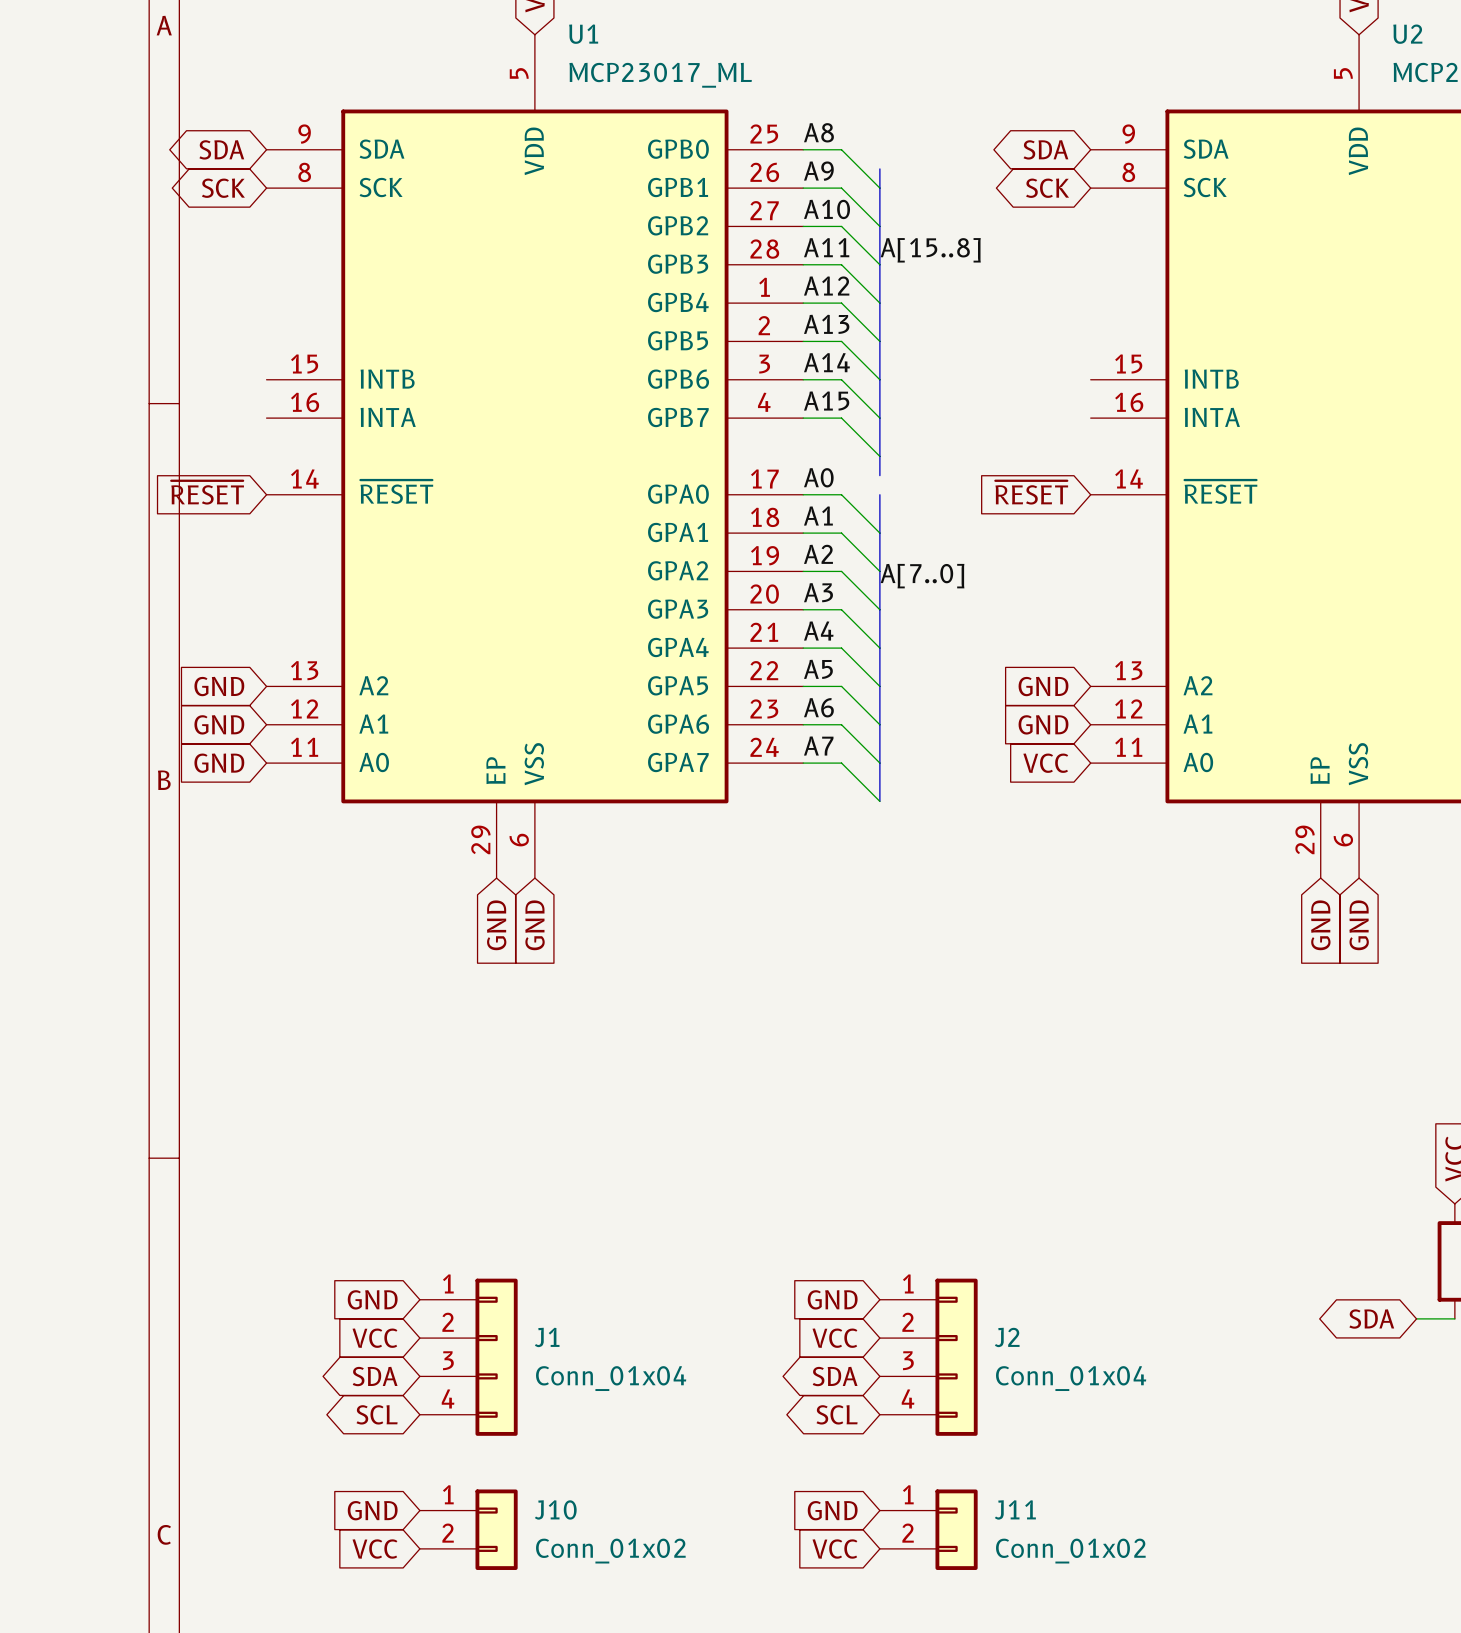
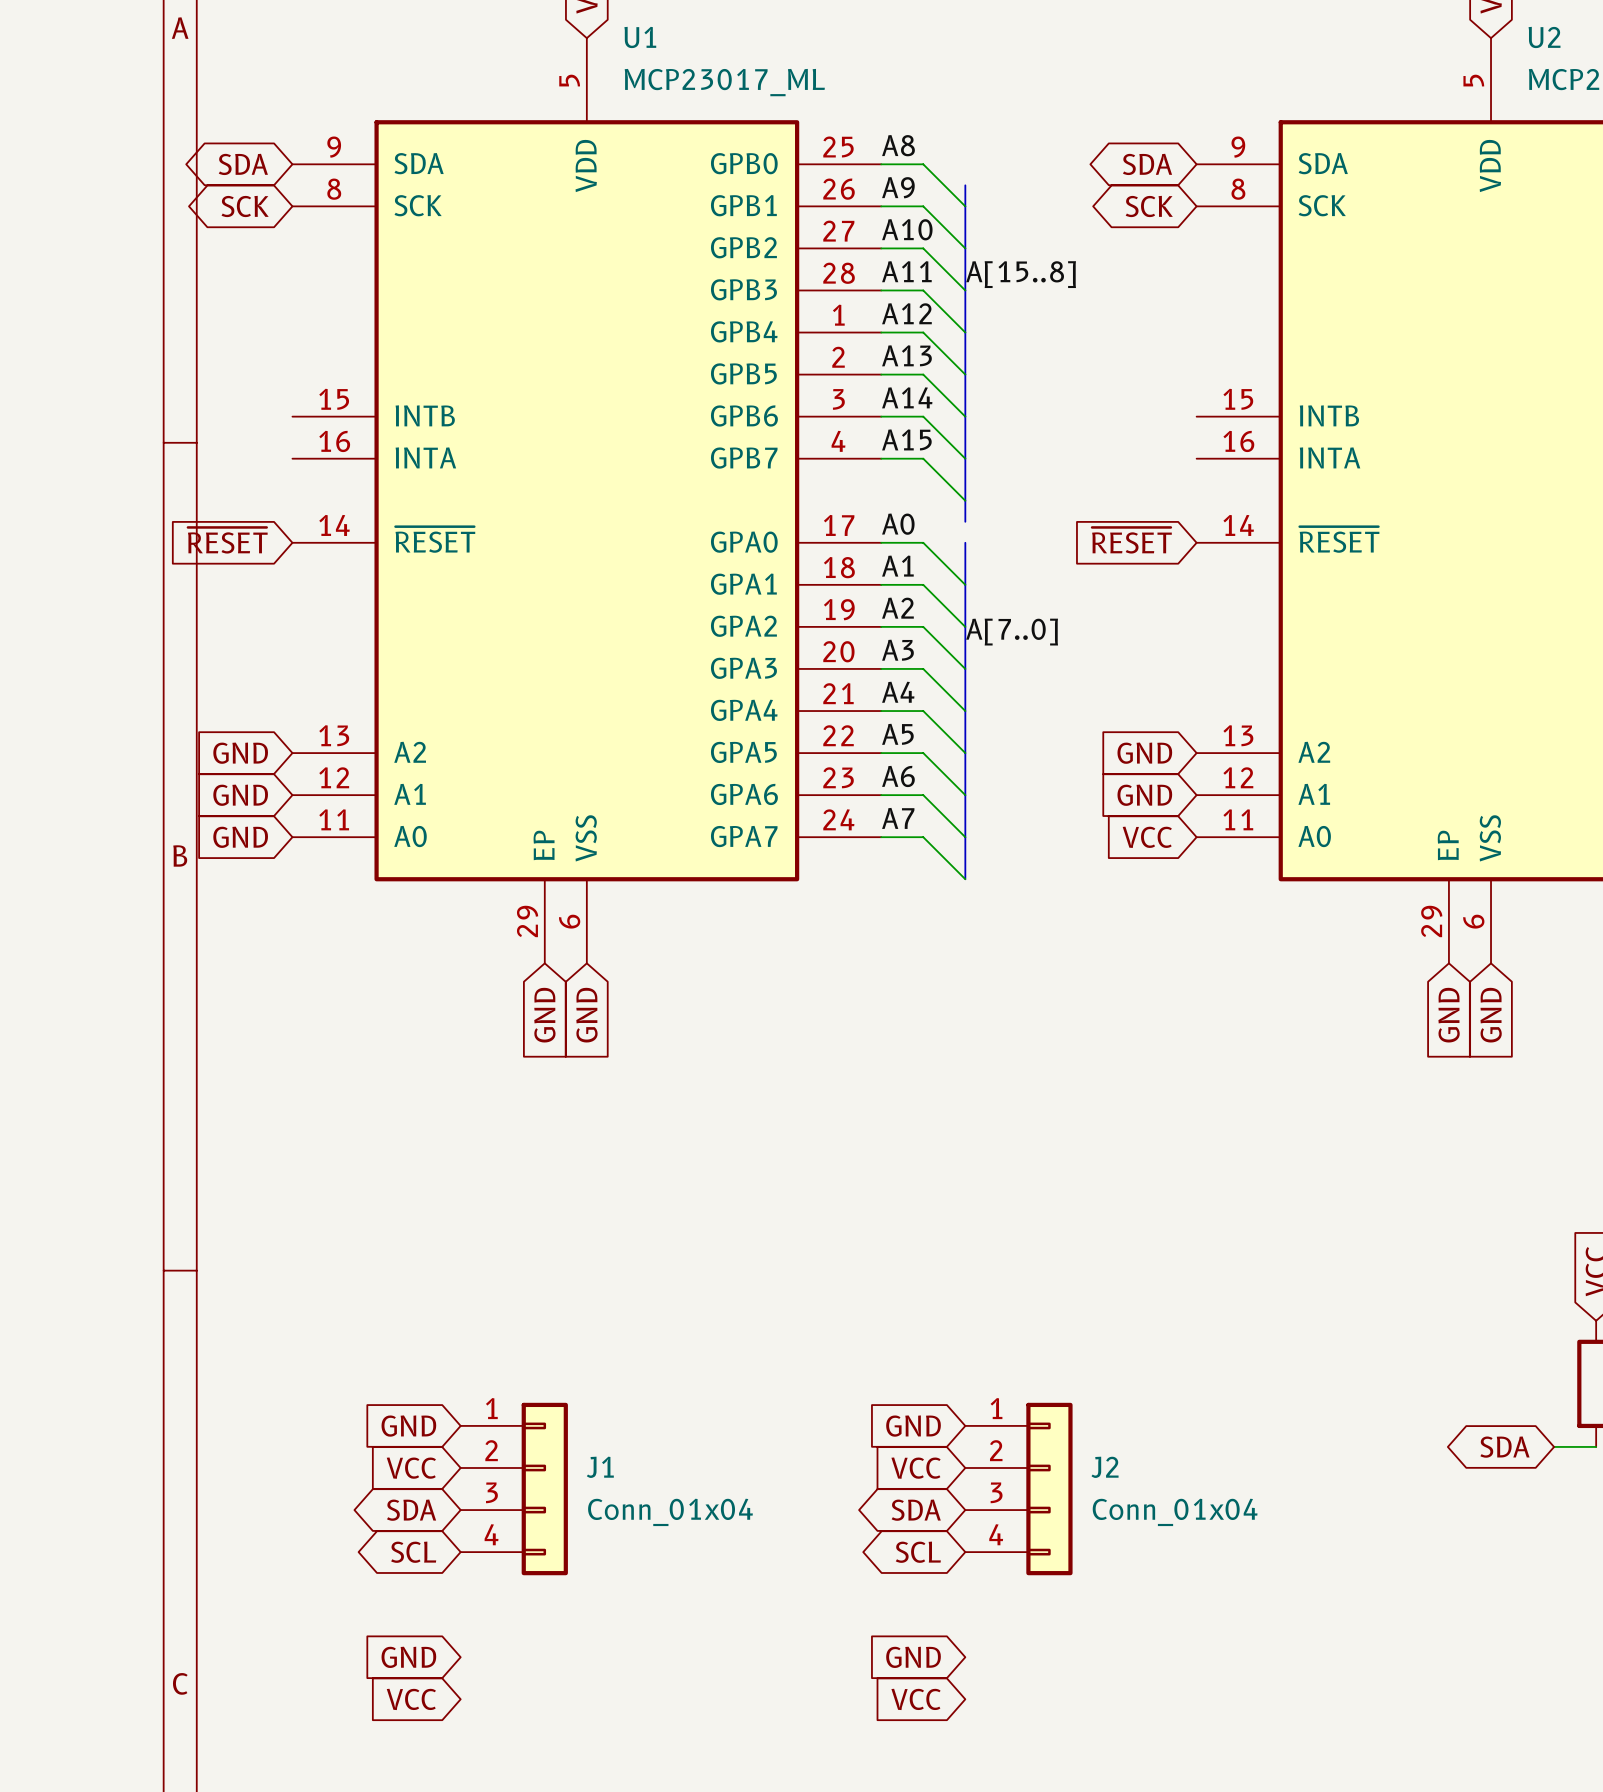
J10: Conn_01x02 (468, 1529) -> none
J11: Conn_01x02 (928, 1529) -> none

